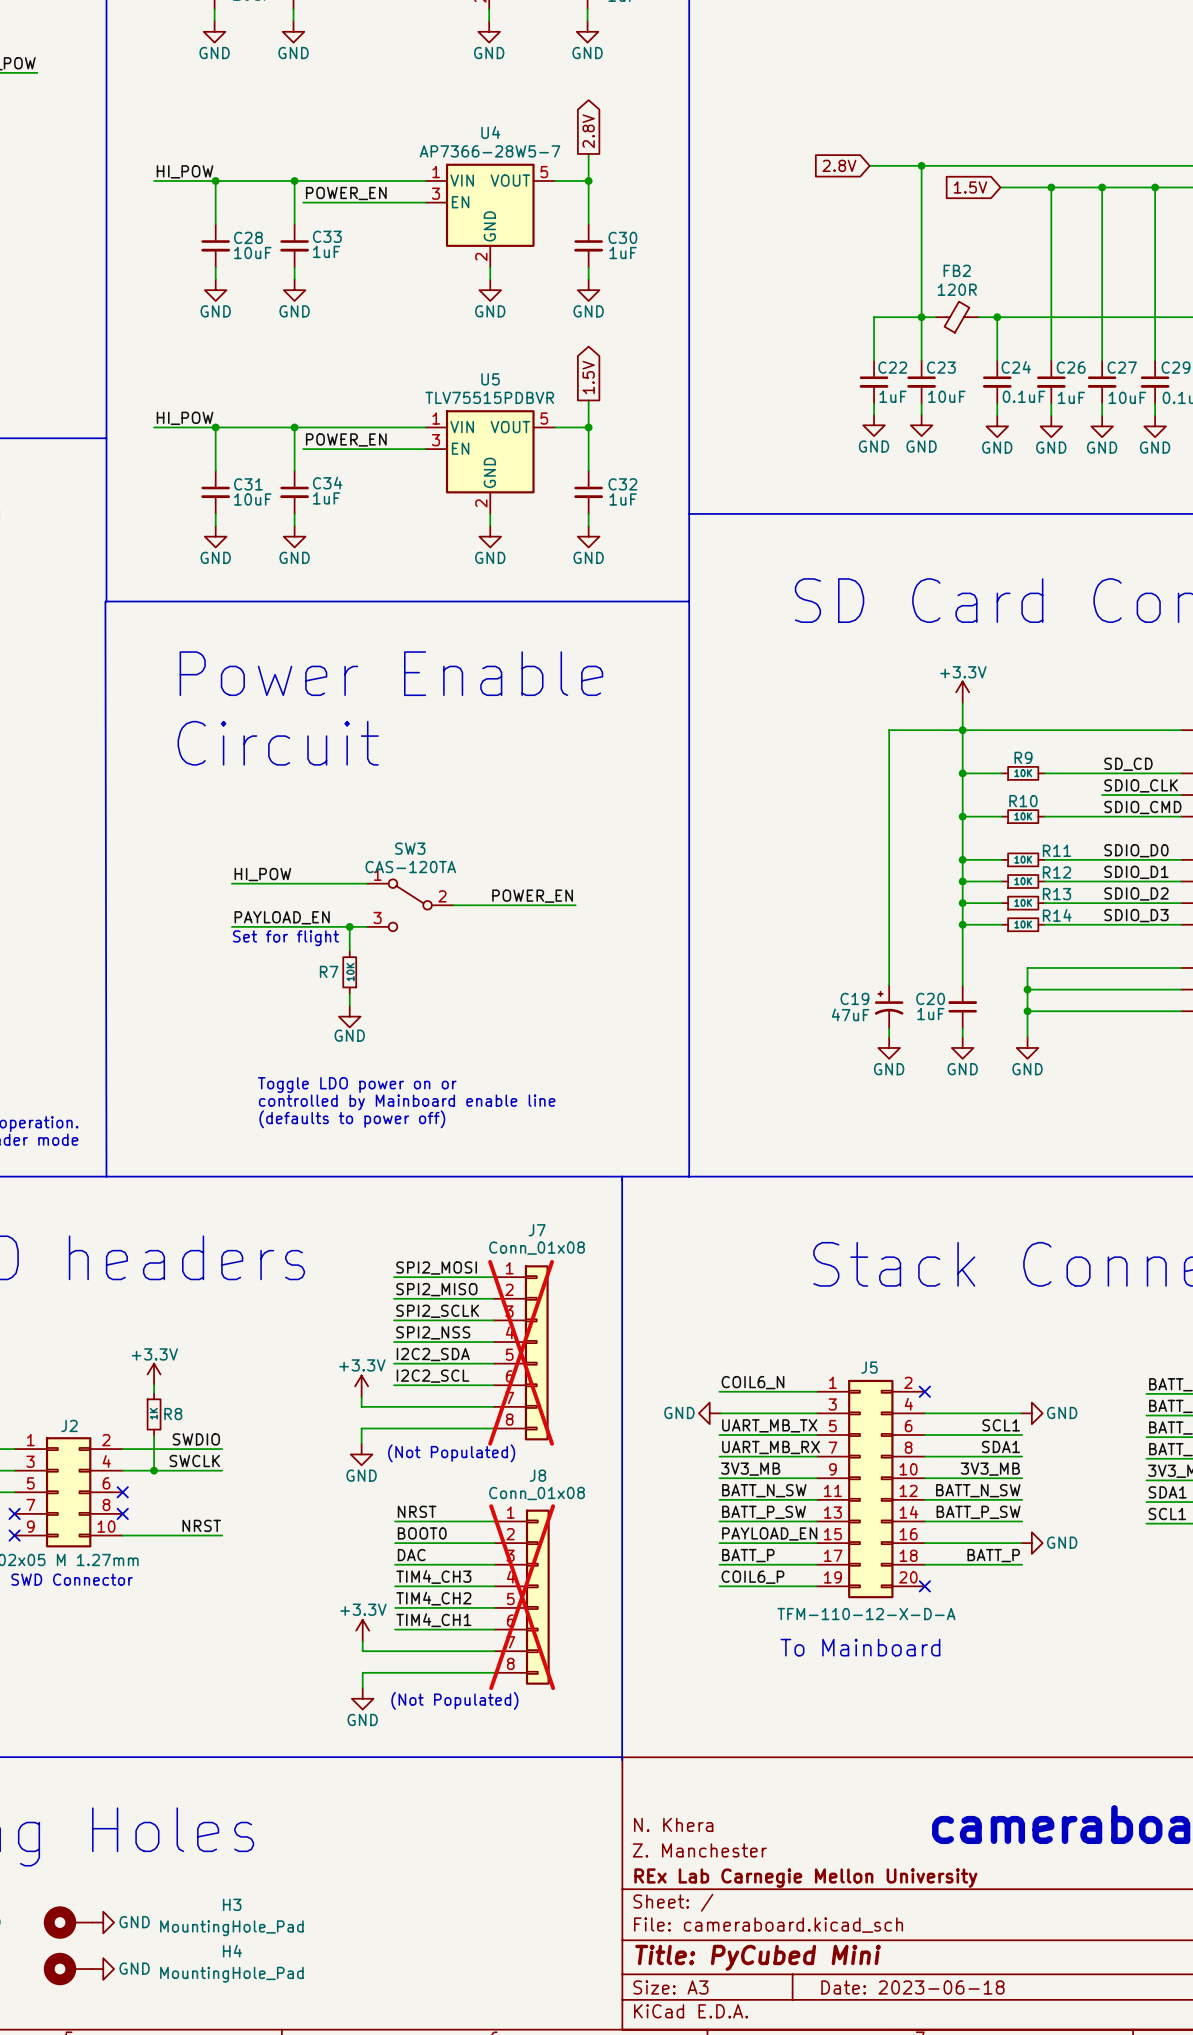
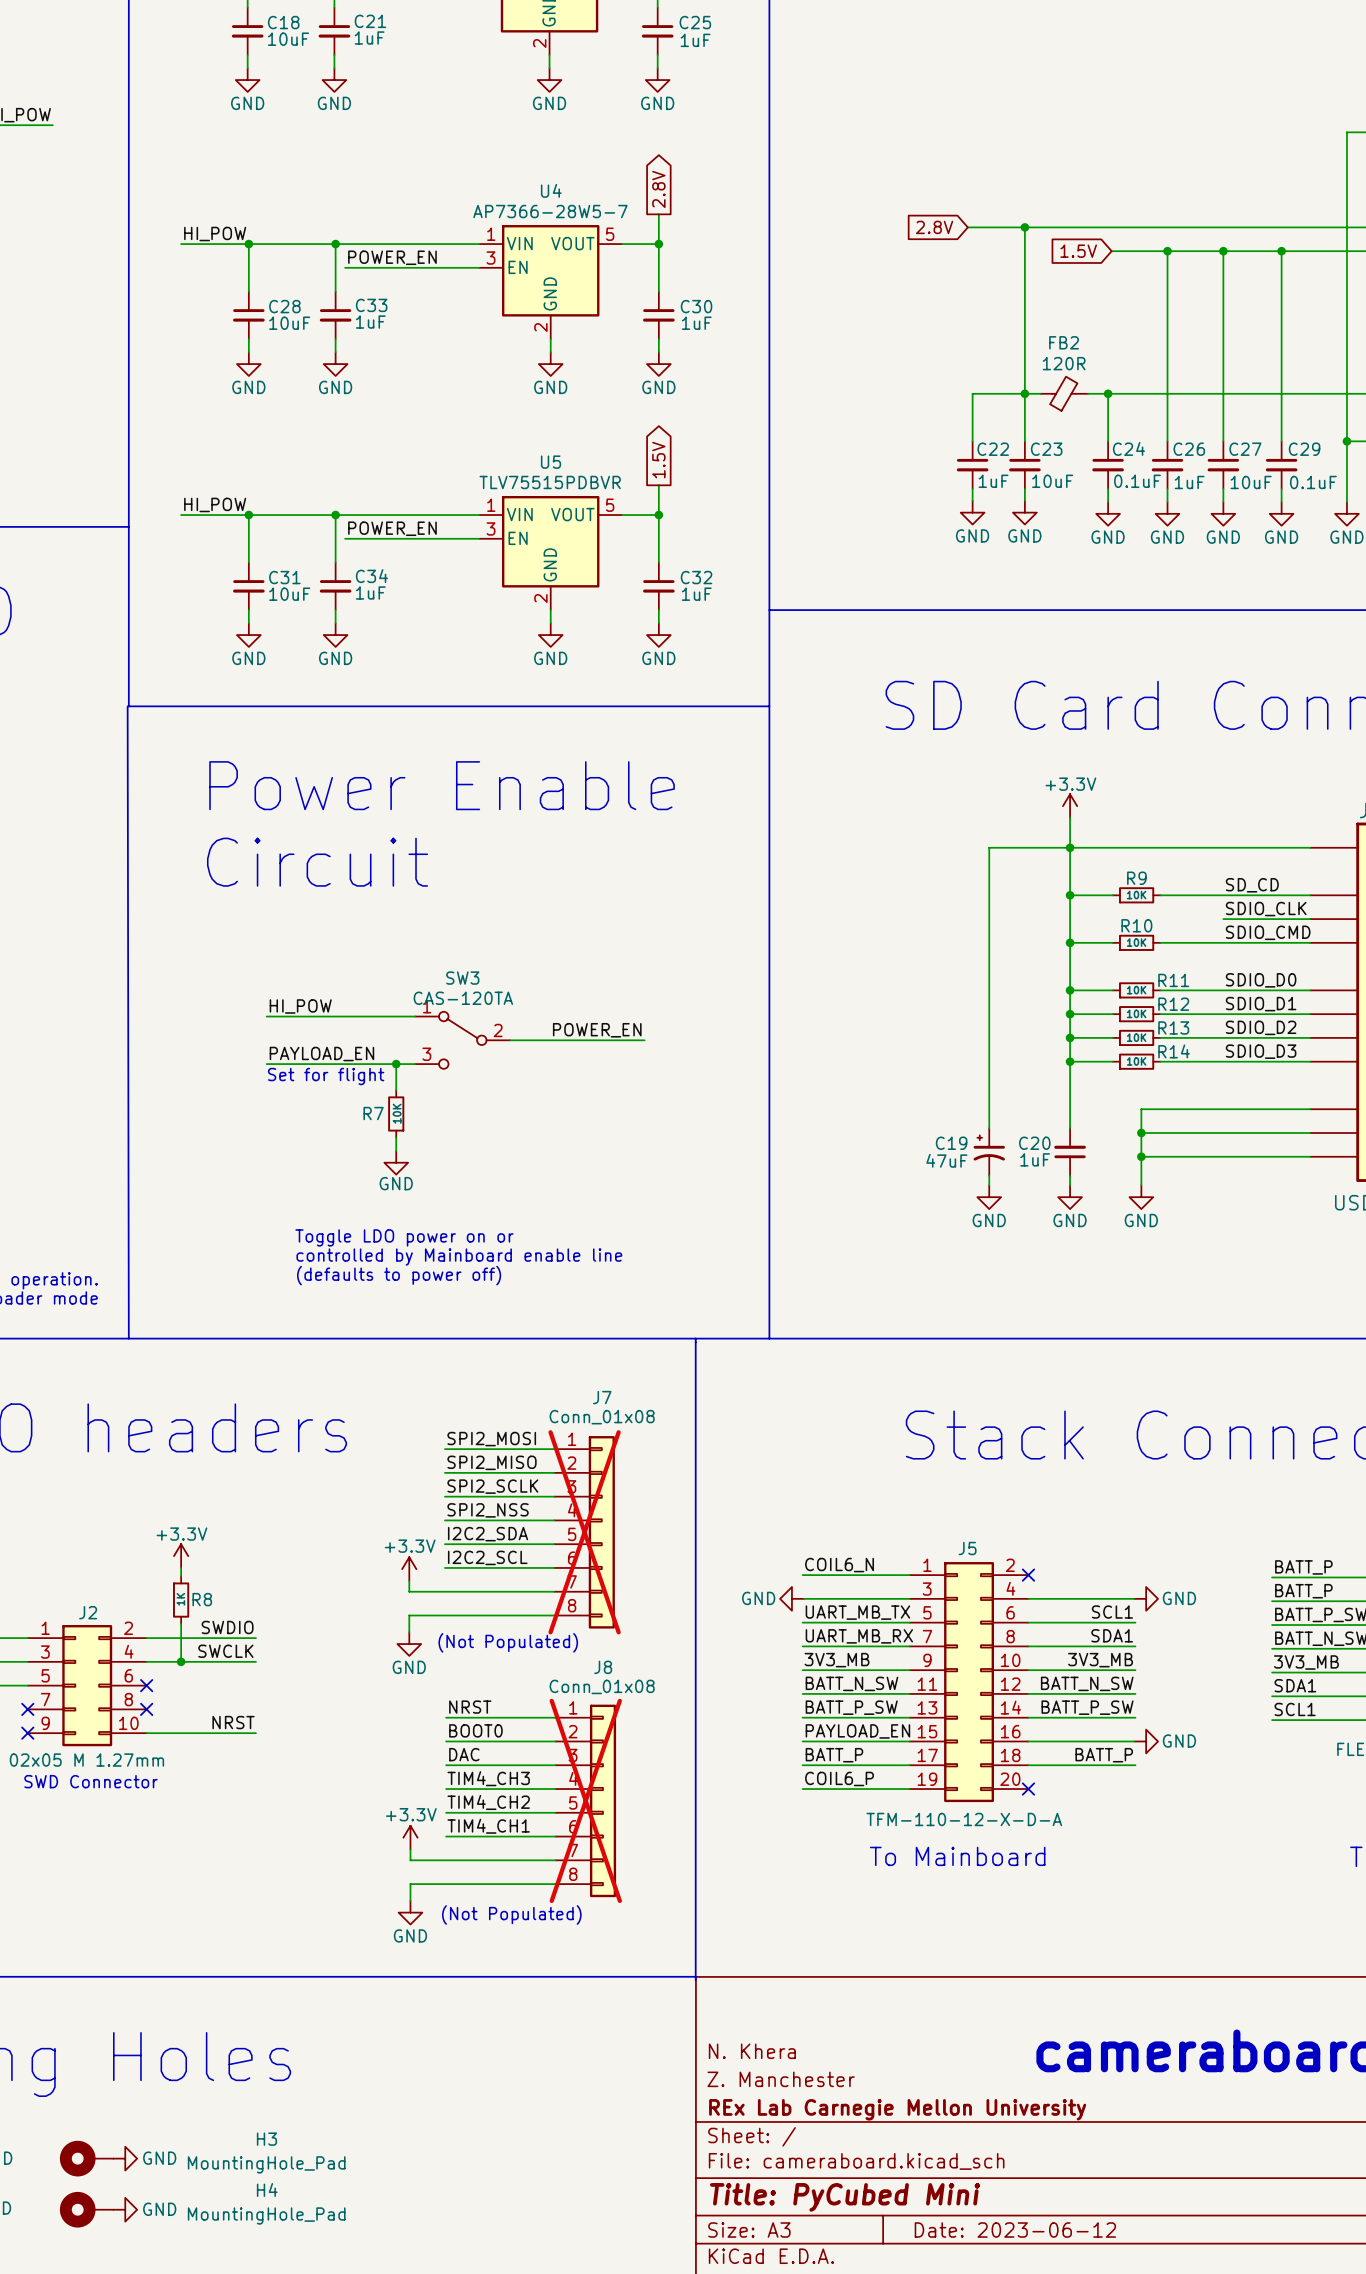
title block: Date: 2023-06-18 (912, 1987) -> Date: 2023-06-12 (1015, 2230)

